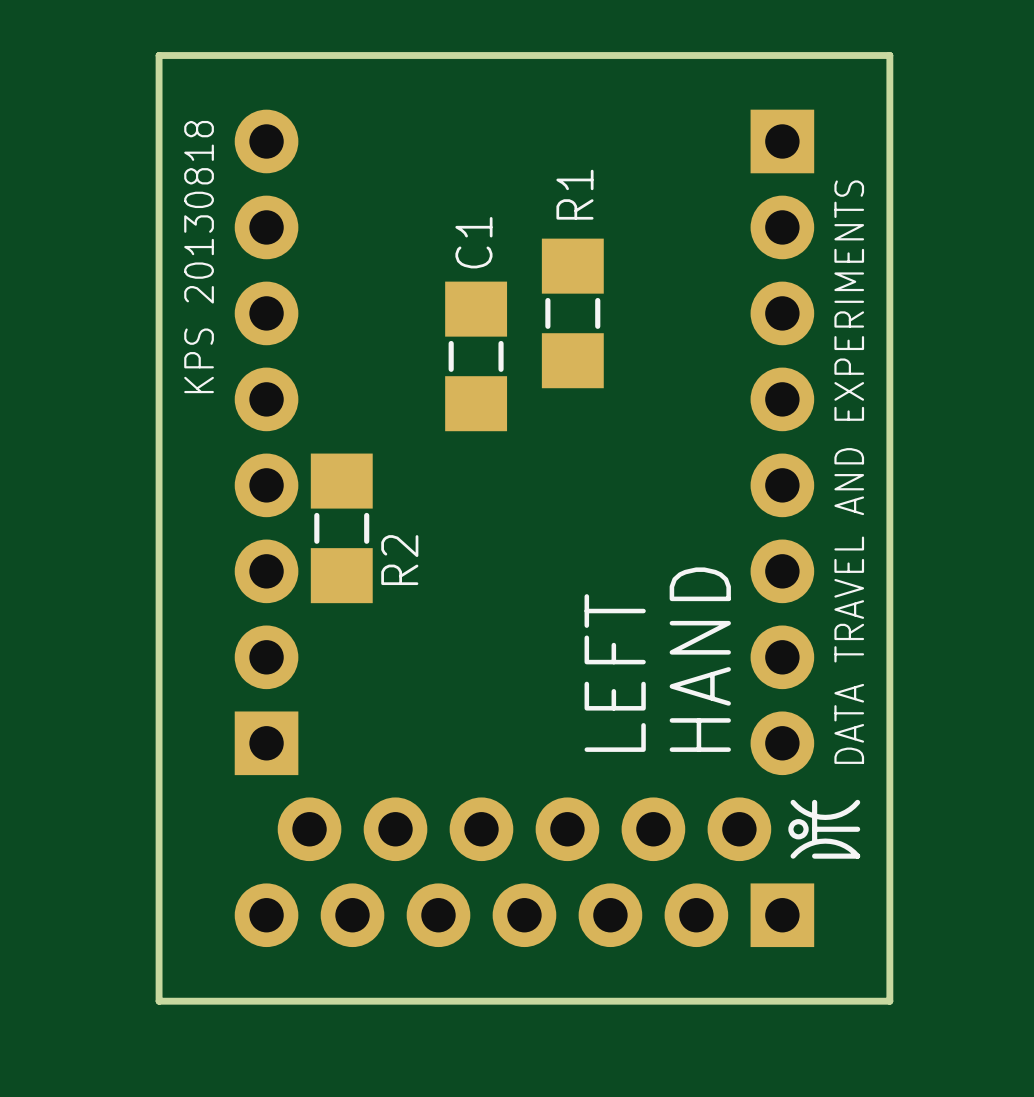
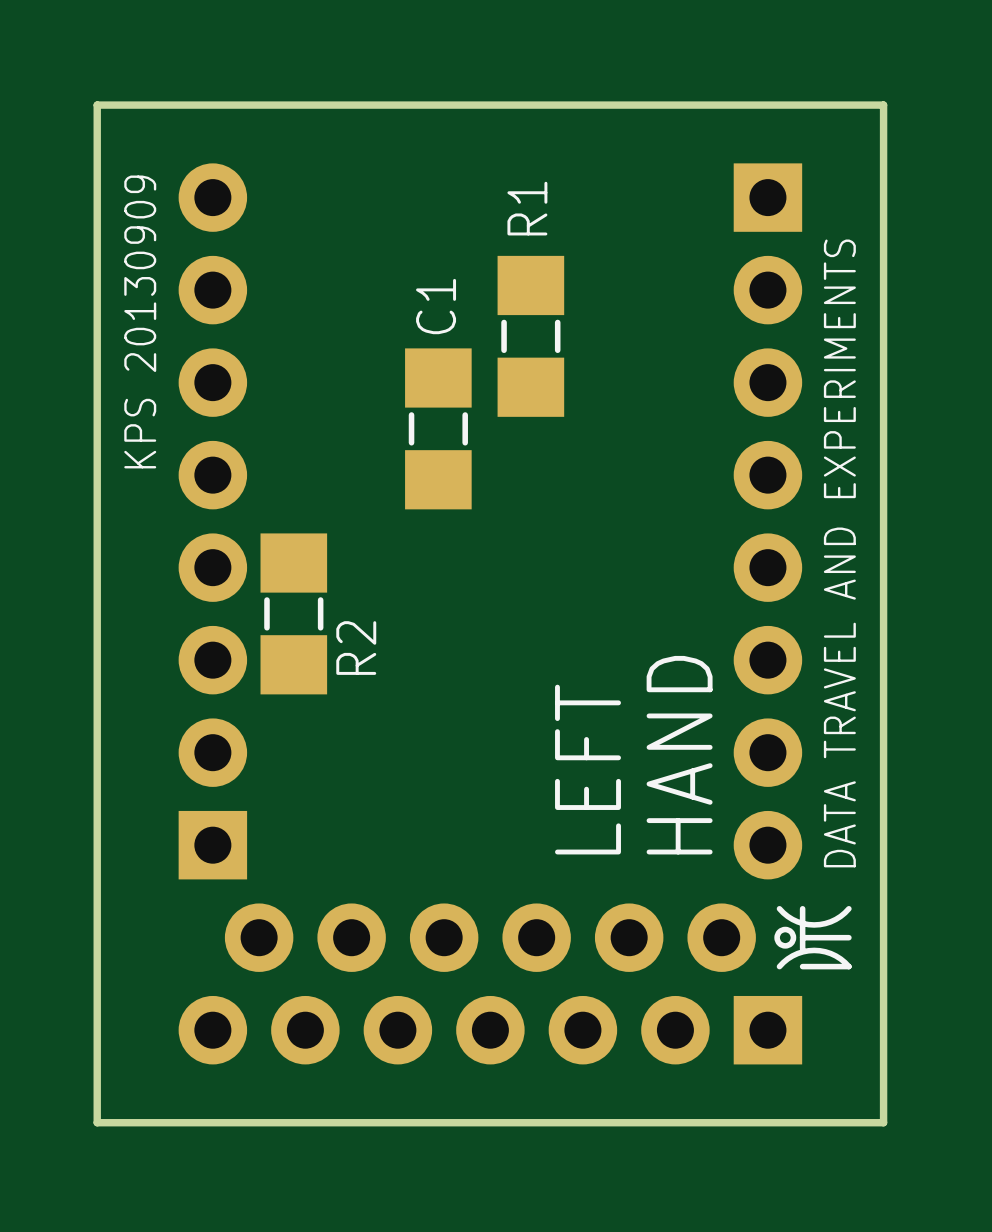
R1 name position: R1 (574, 194) -> R1 (527, 208)
text: KPS 20130818 (199, 257) -> KPS 20130909 (140, 321)
R1 position: (572, 313) -> (530, 336)

